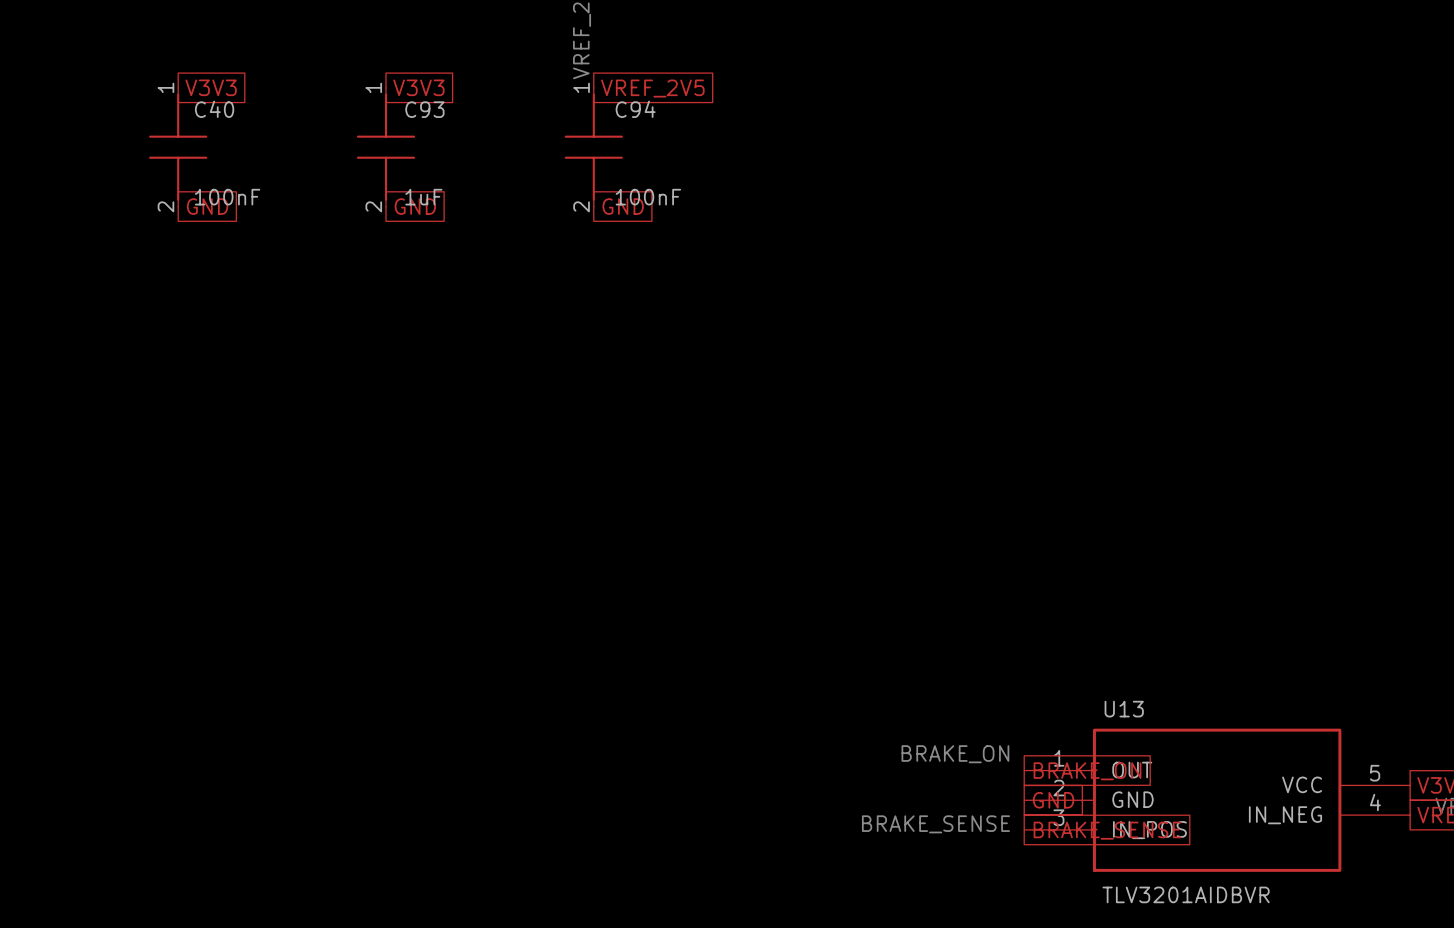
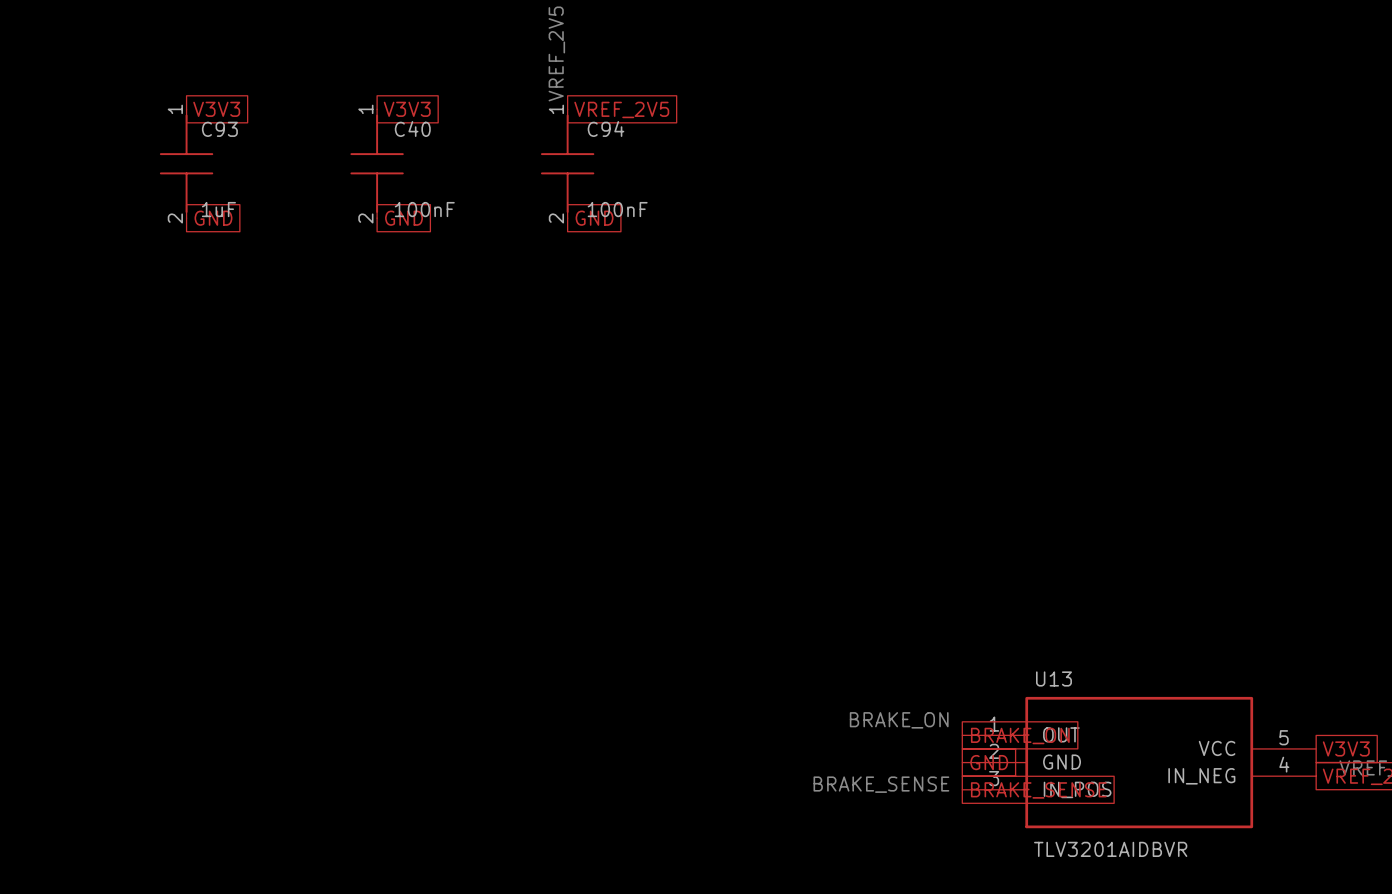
C40 name: C40 (214, 109) -> C93 (219, 129)
C93 name: C93 (424, 109) -> C40 (412, 129)
C40 value: 100nF (227, 197) -> 1uF (218, 209)
C93 value: 1uF (423, 197) -> 100nF (424, 209)

